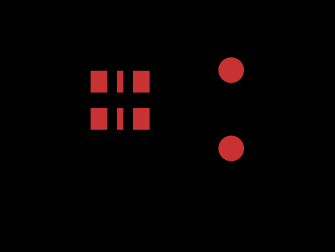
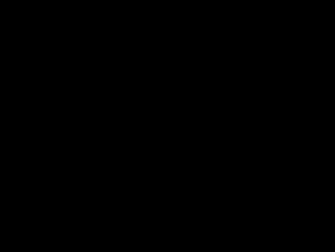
part: (231, 70) -> none
part: (120, 100) -> none
part: (231, 148) -> none

